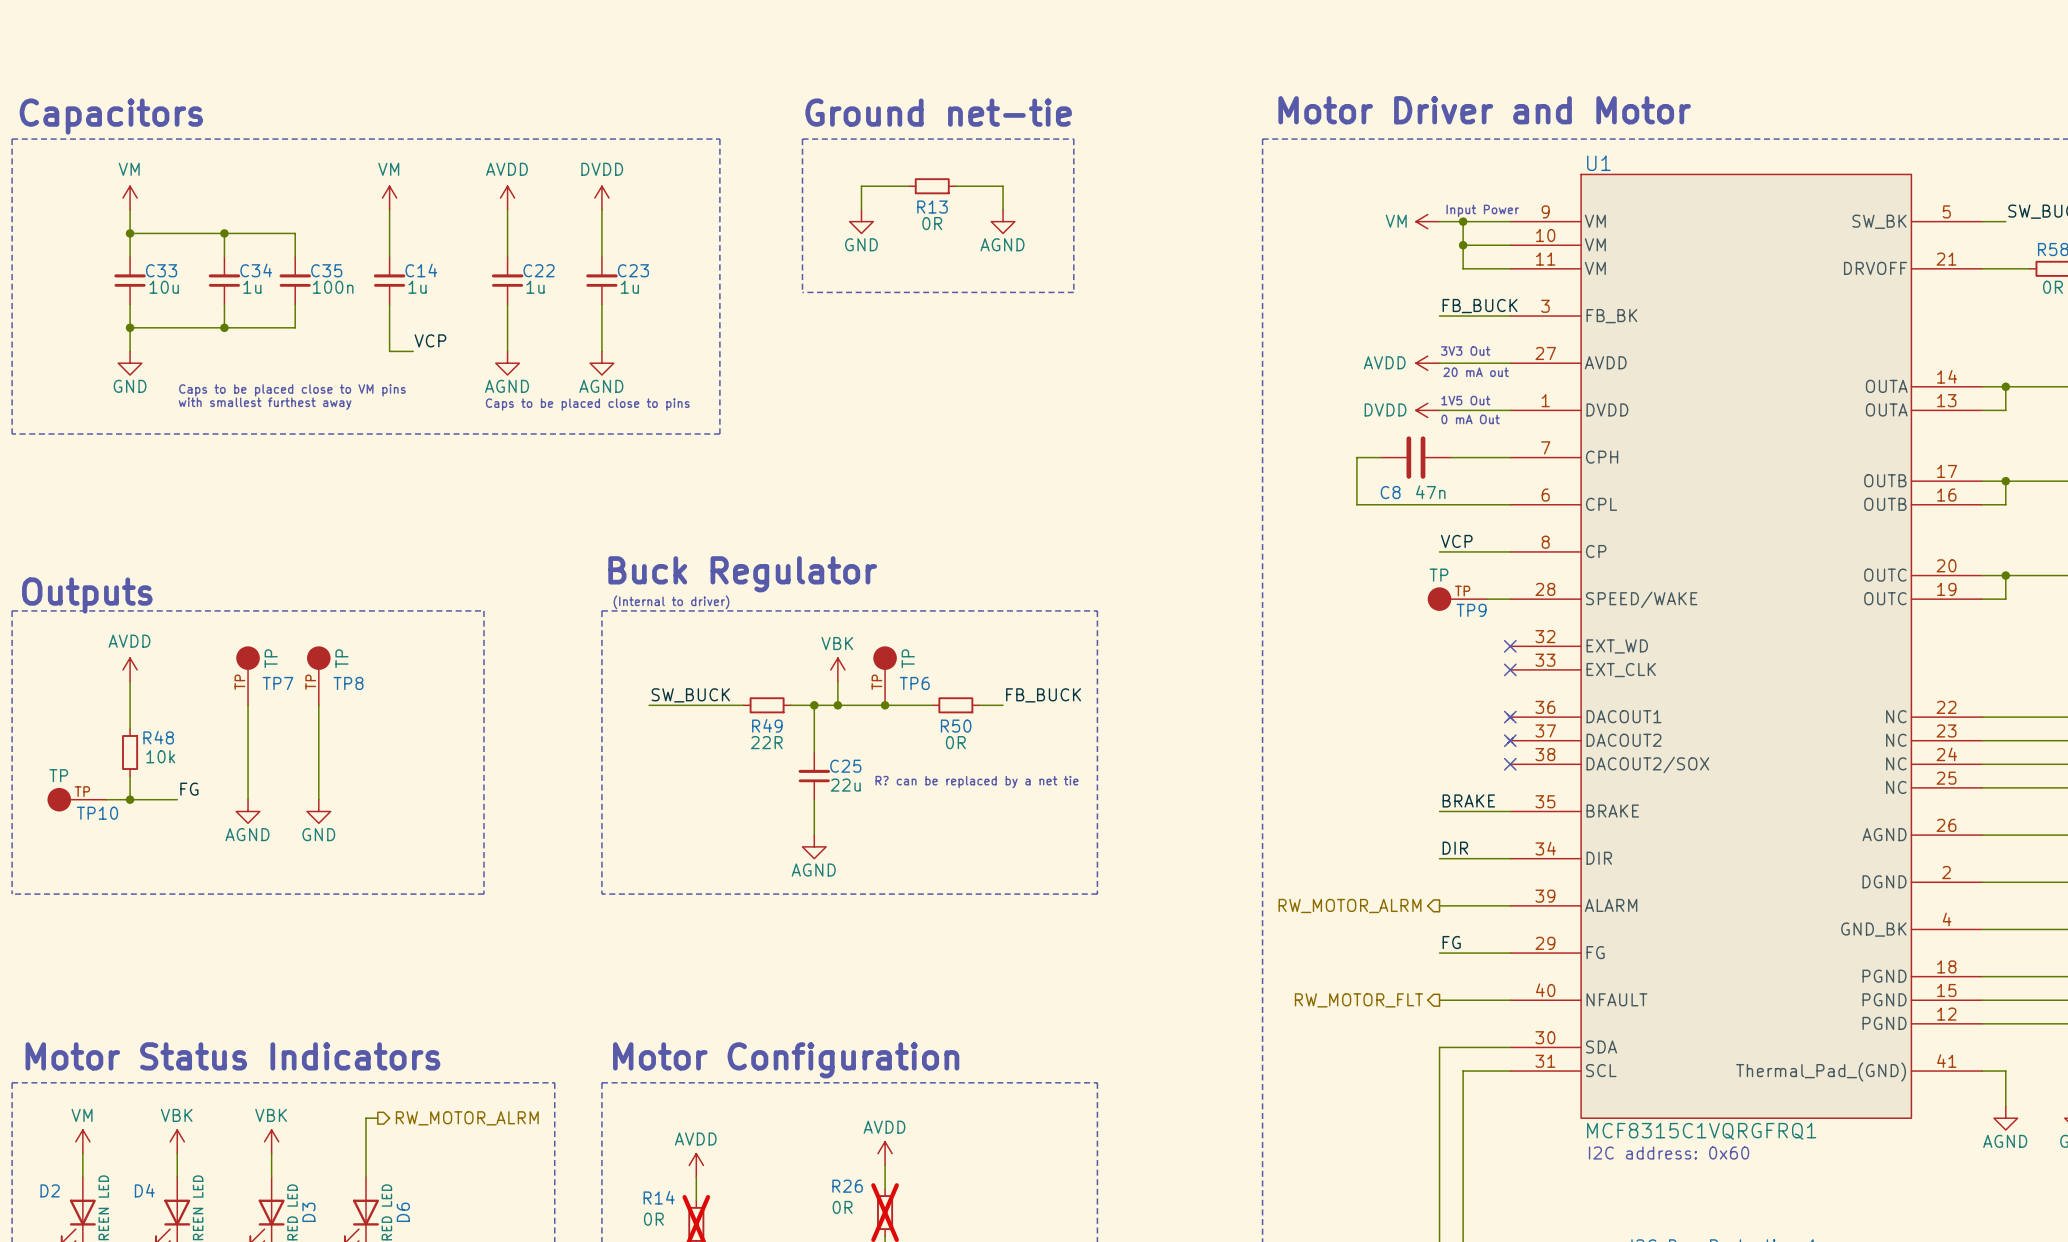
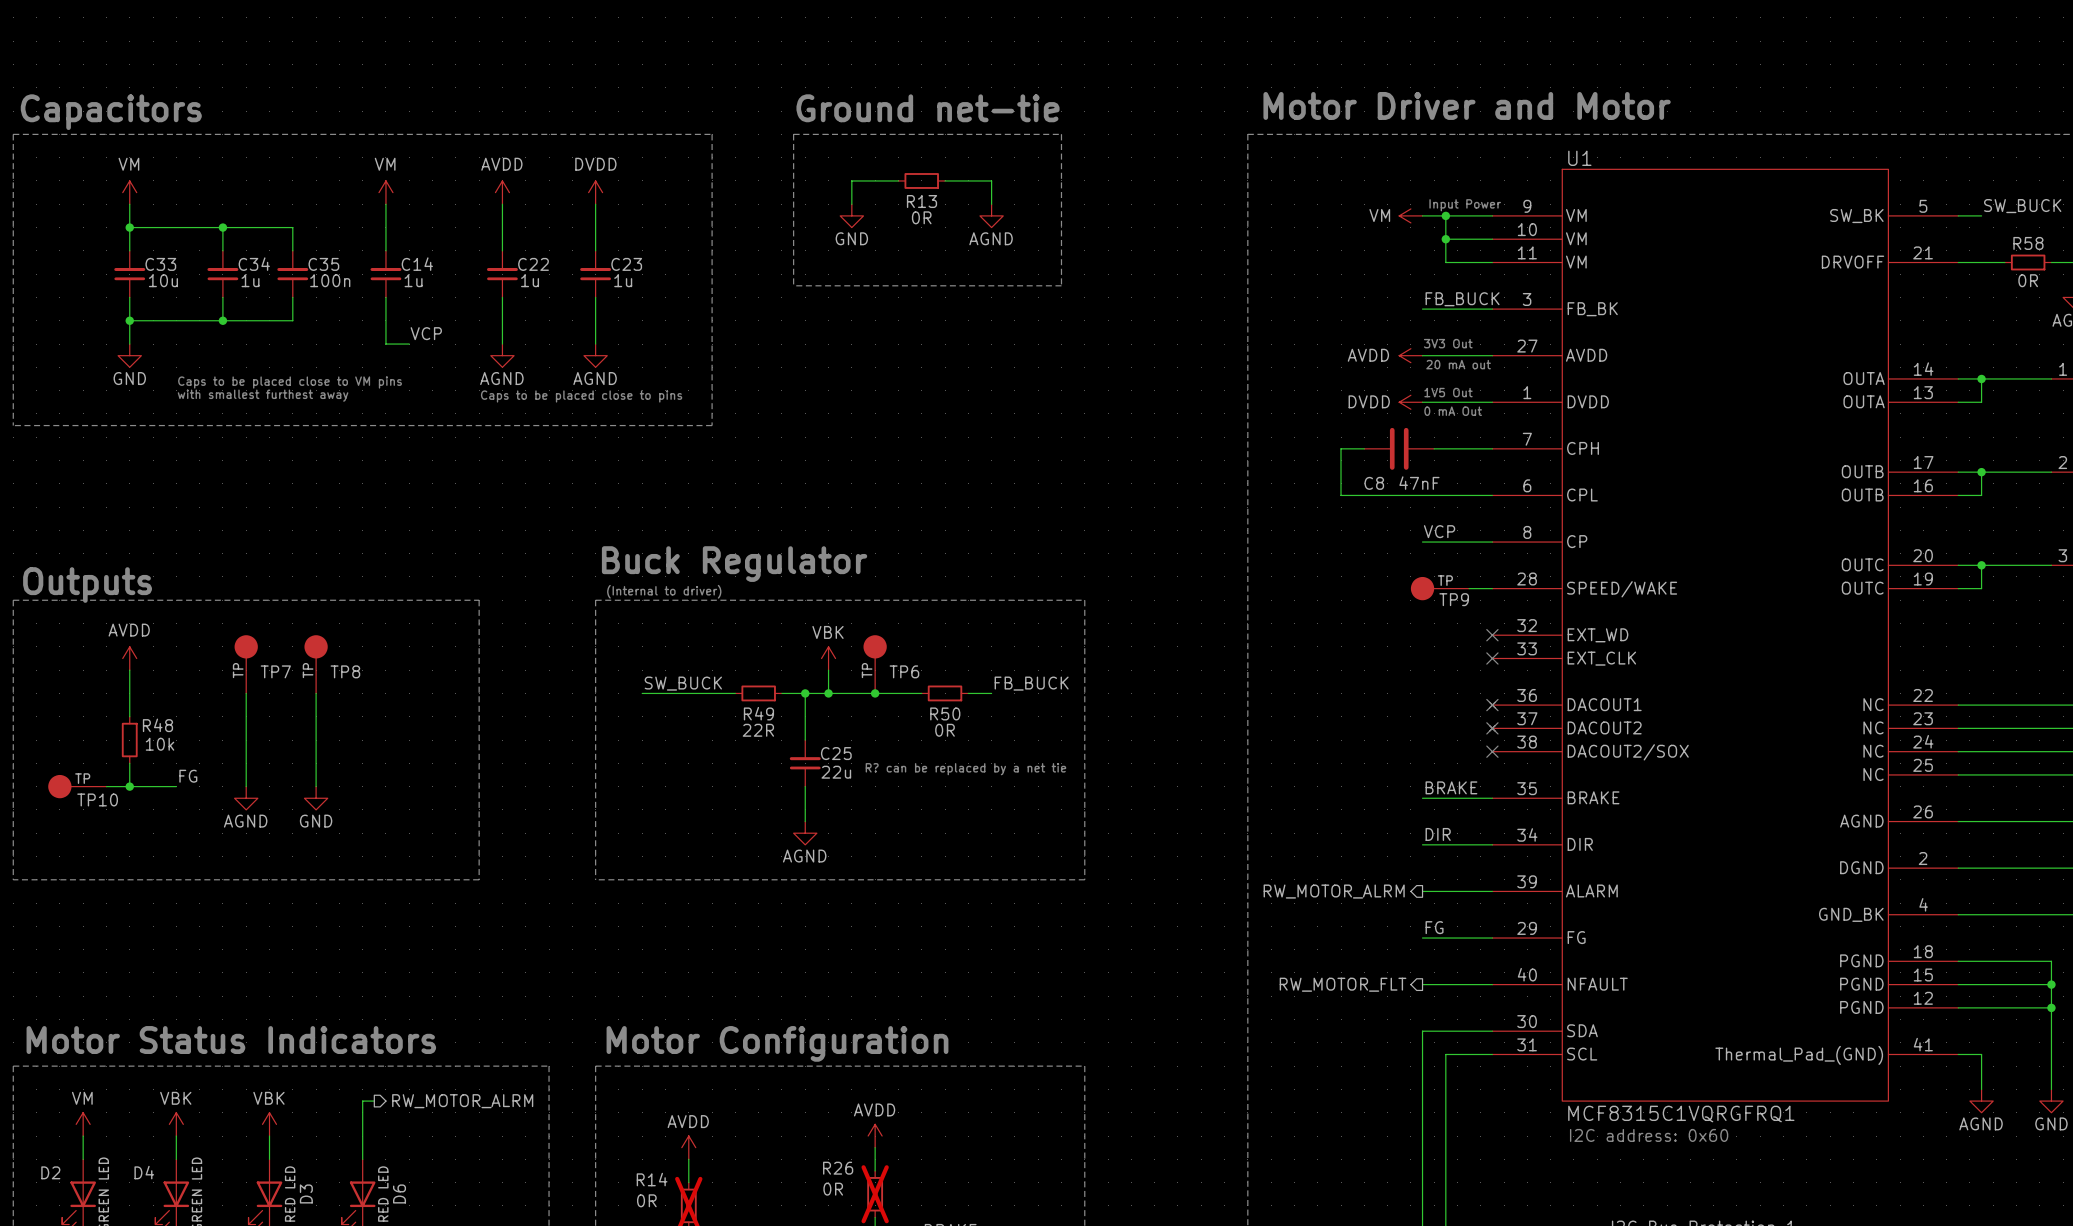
C8 value: 47n (1430, 492) -> 47nF (1419, 483)
TP9 value: TP (1438, 575) -> none
TP7 value: TP (271, 658) -> none
TP8 value: TP (341, 658) -> none
TP6 value: TP (908, 658) -> none
TP10 value: TP (58, 775) -> none

